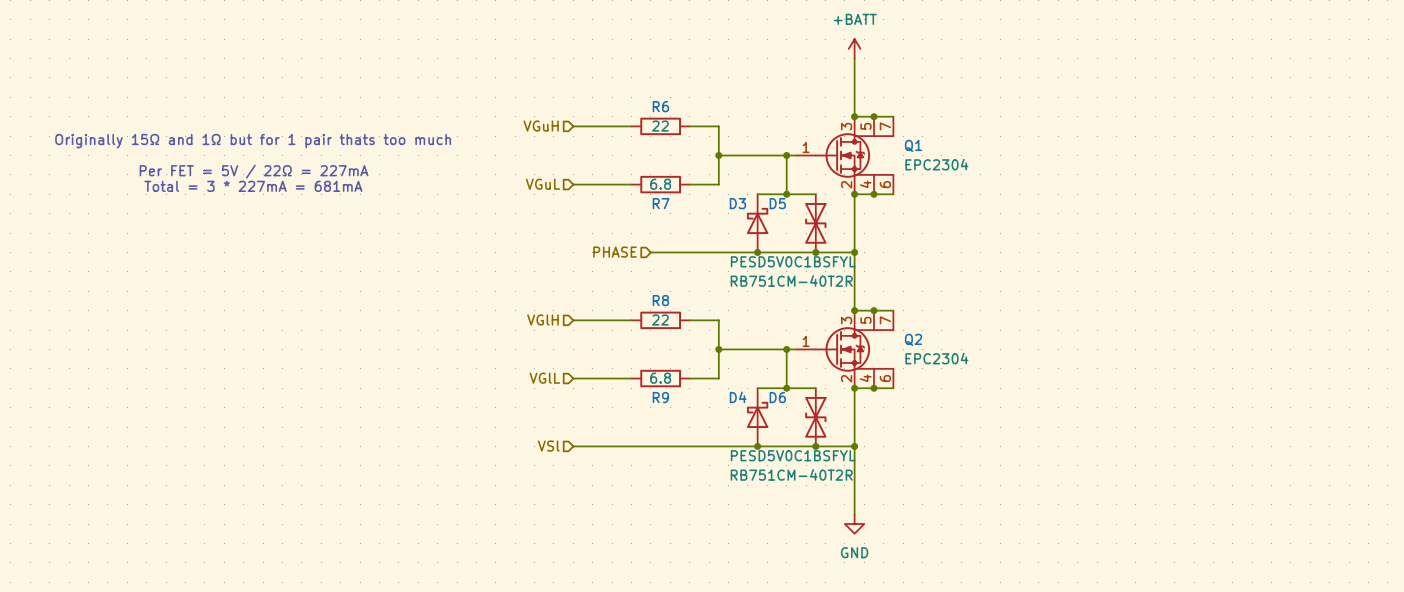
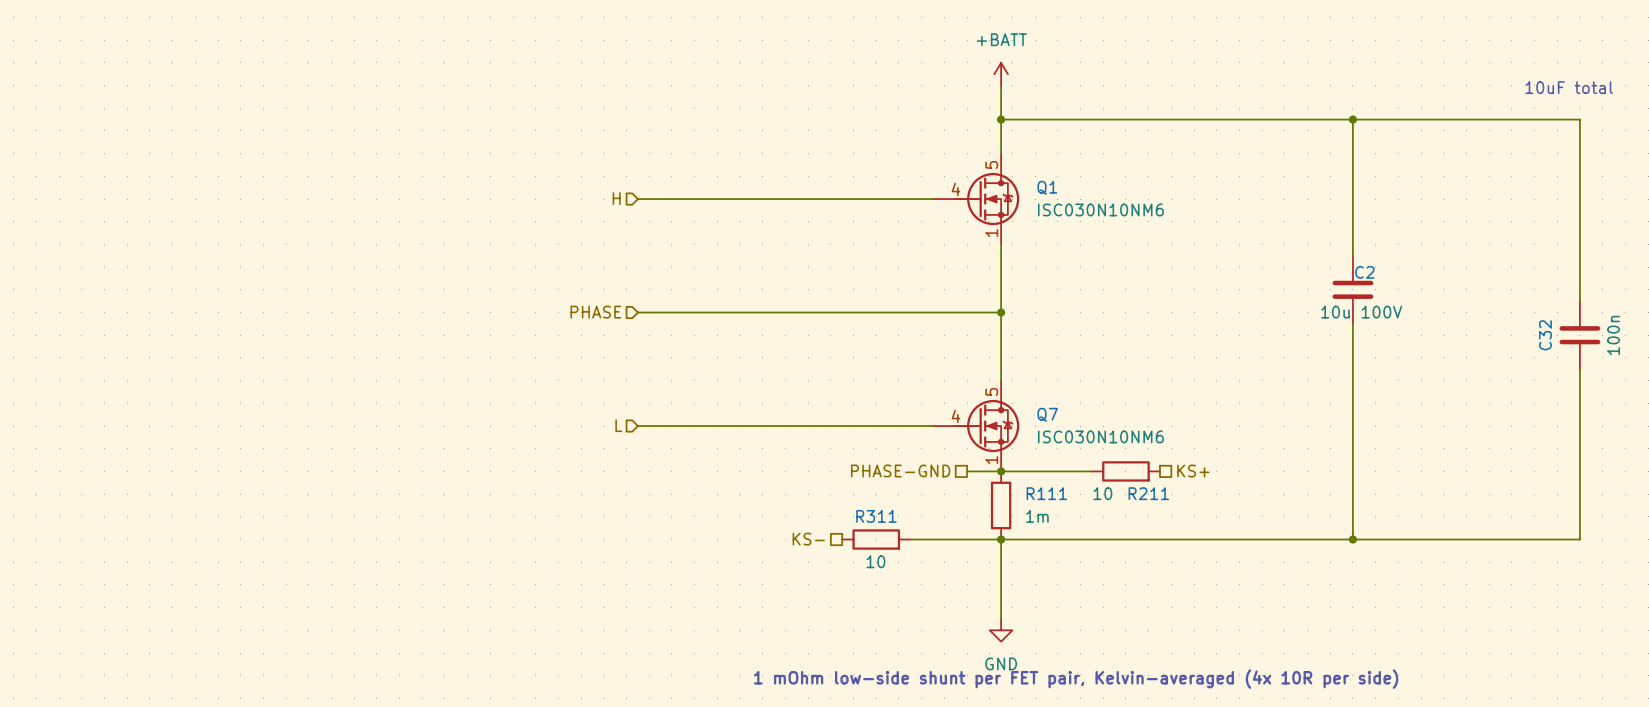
text: none -> 10uF total (1569, 87)
wire: none -> (1001, 119) (1579, 119) (1579, 301)
junction: none -> (1001, 119)
wire: none -> (1352, 119) (1352, 255)
junction: none -> (1352, 119)
Q1 symbol: [796, 116, 894, 195] -> [933, 153, 1020, 245]
wire: (854, 116) (893, 116) -> none
junction: (854, 116) -> none
junction: (873, 116) -> none
hierarchical label: VGuH (541, 126) -> none
wire: (573, 126) (631, 126) -> none
R6: 22 (660, 126) -> none
wire: (689, 126) (718, 126) (718, 184) (689, 184) -> none
text: Originally 15Ω and 1Ω but for 1 pair thats too much (253, 141) -> none
hierarchical label: none -> H (616, 198)
wire: none -> (637, 199) (842, 199)
junction: (718, 155) -> none
wire: (786, 155) (786, 194) -> none
junction: (786, 155) -> none
Q1 value: EPC2304 (936, 164) -> ISC030N10NM6 (1100, 209)
text: Per FET = 5V / 22Ω = 227mA (254, 171) -> none
hierarchical label: VGuL (542, 184) -> none
wire: (573, 184) (631, 184) -> none
R7: 6.8 (660, 184) -> none
text: Total = 3 * 227mA = 681mA (253, 186) -> none
wire: (757, 194) (815, 194) -> none
junction: (786, 194) -> none
wire: (854, 194) (893, 194) -> none
junction: (854, 194) -> none
junction: (873, 194) -> none
D3: RB751CM-40T2R (757, 223) -> none
D5: PESD5V0C1BSFYL (815, 223) -> none
C2: none -> 10u 100V (1352, 289)
wire: none -> (637, 312) (762, 312)
hierarchical label position: PHASE (615, 252) -> PHASE (595, 312)
junction: (757, 252) -> none
junction: (815, 252) -> none
wire: none -> (1352, 323) (1352, 539)
C32: none -> 100n (1579, 335)
wire: none -> (1579, 369) (1579, 539) (1001, 539)
wire: (854, 310) (893, 310) -> (1046, 471) (1091, 471)
junction: (854, 310) -> none
junction: (873, 310) -> none
hierarchical label: VGlH (542, 319) -> none
wire: (573, 320) (631, 320) -> none
R8: 22 (660, 320) -> none
wire: (689, 320) (718, 320) (718, 378) (689, 378) -> none
hierarchical label: none -> L (618, 425)
wire: none -> (637, 426) (842, 426)
junction: (718, 349) -> none
wire: (786, 349) (786, 388) -> none
junction: (786, 349) -> none
Q7: none -> ISC030N10NM6 (976, 426)
Q2: EPC2304 (844, 349) -> none
hierarchical label: VGlL (544, 378) -> none
wire: (573, 378) (631, 378) -> none
R9: 6.8 (660, 378) -> none
hierarchical label: none -> PHASE-GND (900, 471)
hierarchical label: none -> KS+ (1193, 471)
wire: (757, 388) (815, 388) -> none
junction: (786, 388) -> none
wire: (854, 388) (854, 446) -> (1001, 471) (967, 471)
junction: (873, 388) -> none
R211: none -> 10 (1125, 471)
D4: RB751CM-40T2R (757, 417) -> none
D6: PESD5V0C1BSFYL (815, 417) -> none
R111: none -> 1m (1001, 505)
hierarchical label: VSl (548, 446) -> none
wire: (573, 446) (777, 446) -> none
hierarchical label: none -> KS- (808, 539)
R311: none -> 10 (876, 539)
junction: (757, 446) -> none
junction: (815, 446) -> none
junction: none -> (1352, 539)
text: none -> 1 mOhm low-side shunt per FET pair, Kelvin-averaged (4x 10R per side) (1076, 679)

